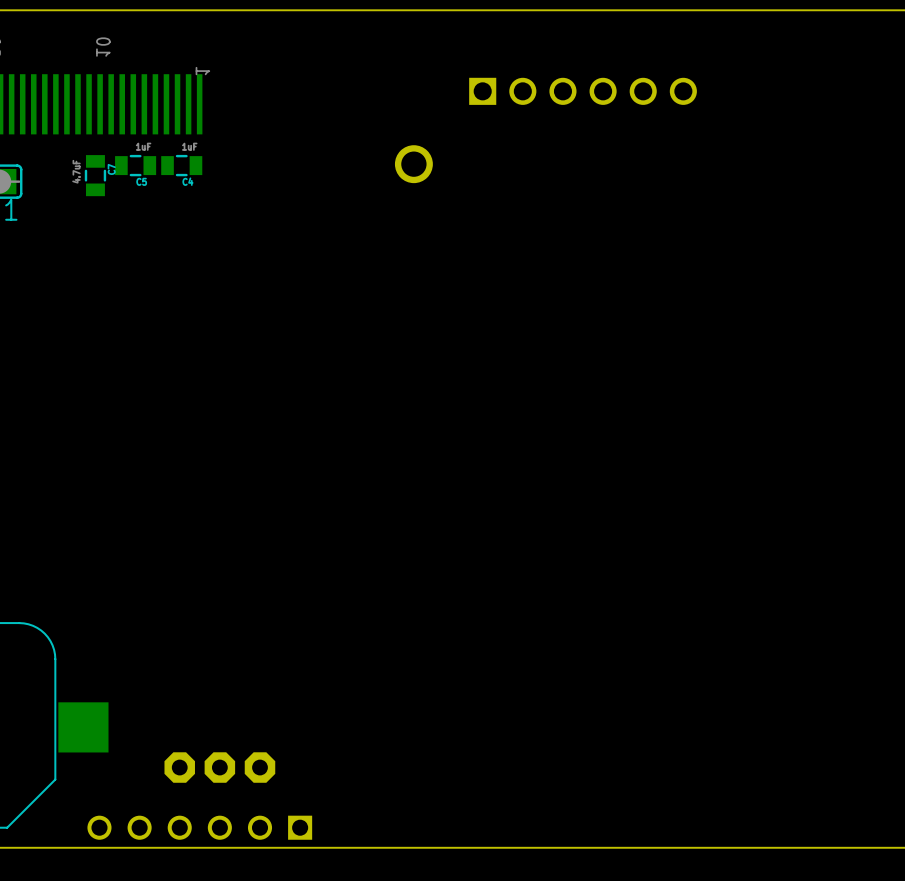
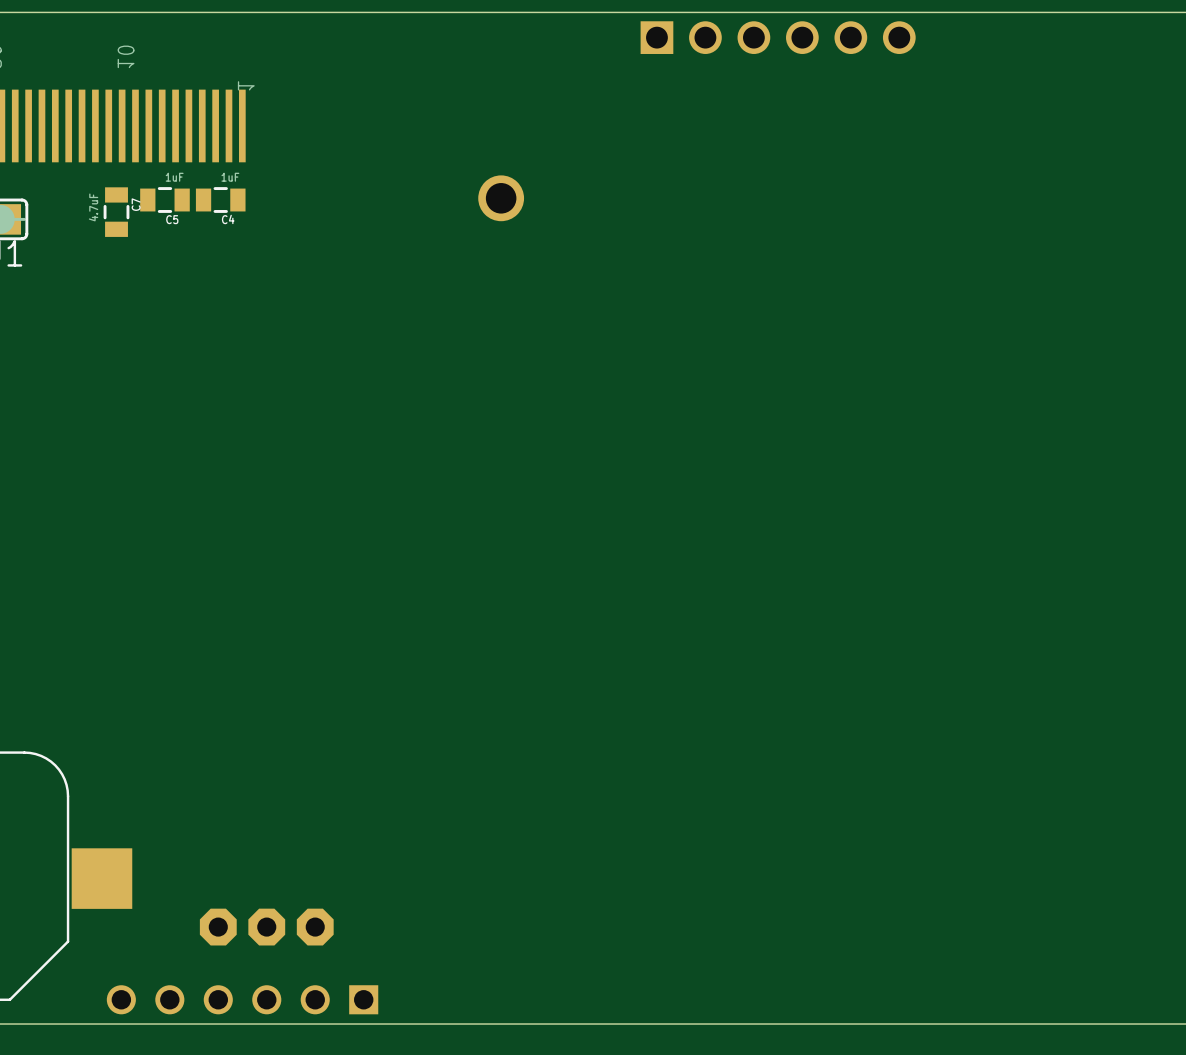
part position: (583, 91) -> (778, 37)

